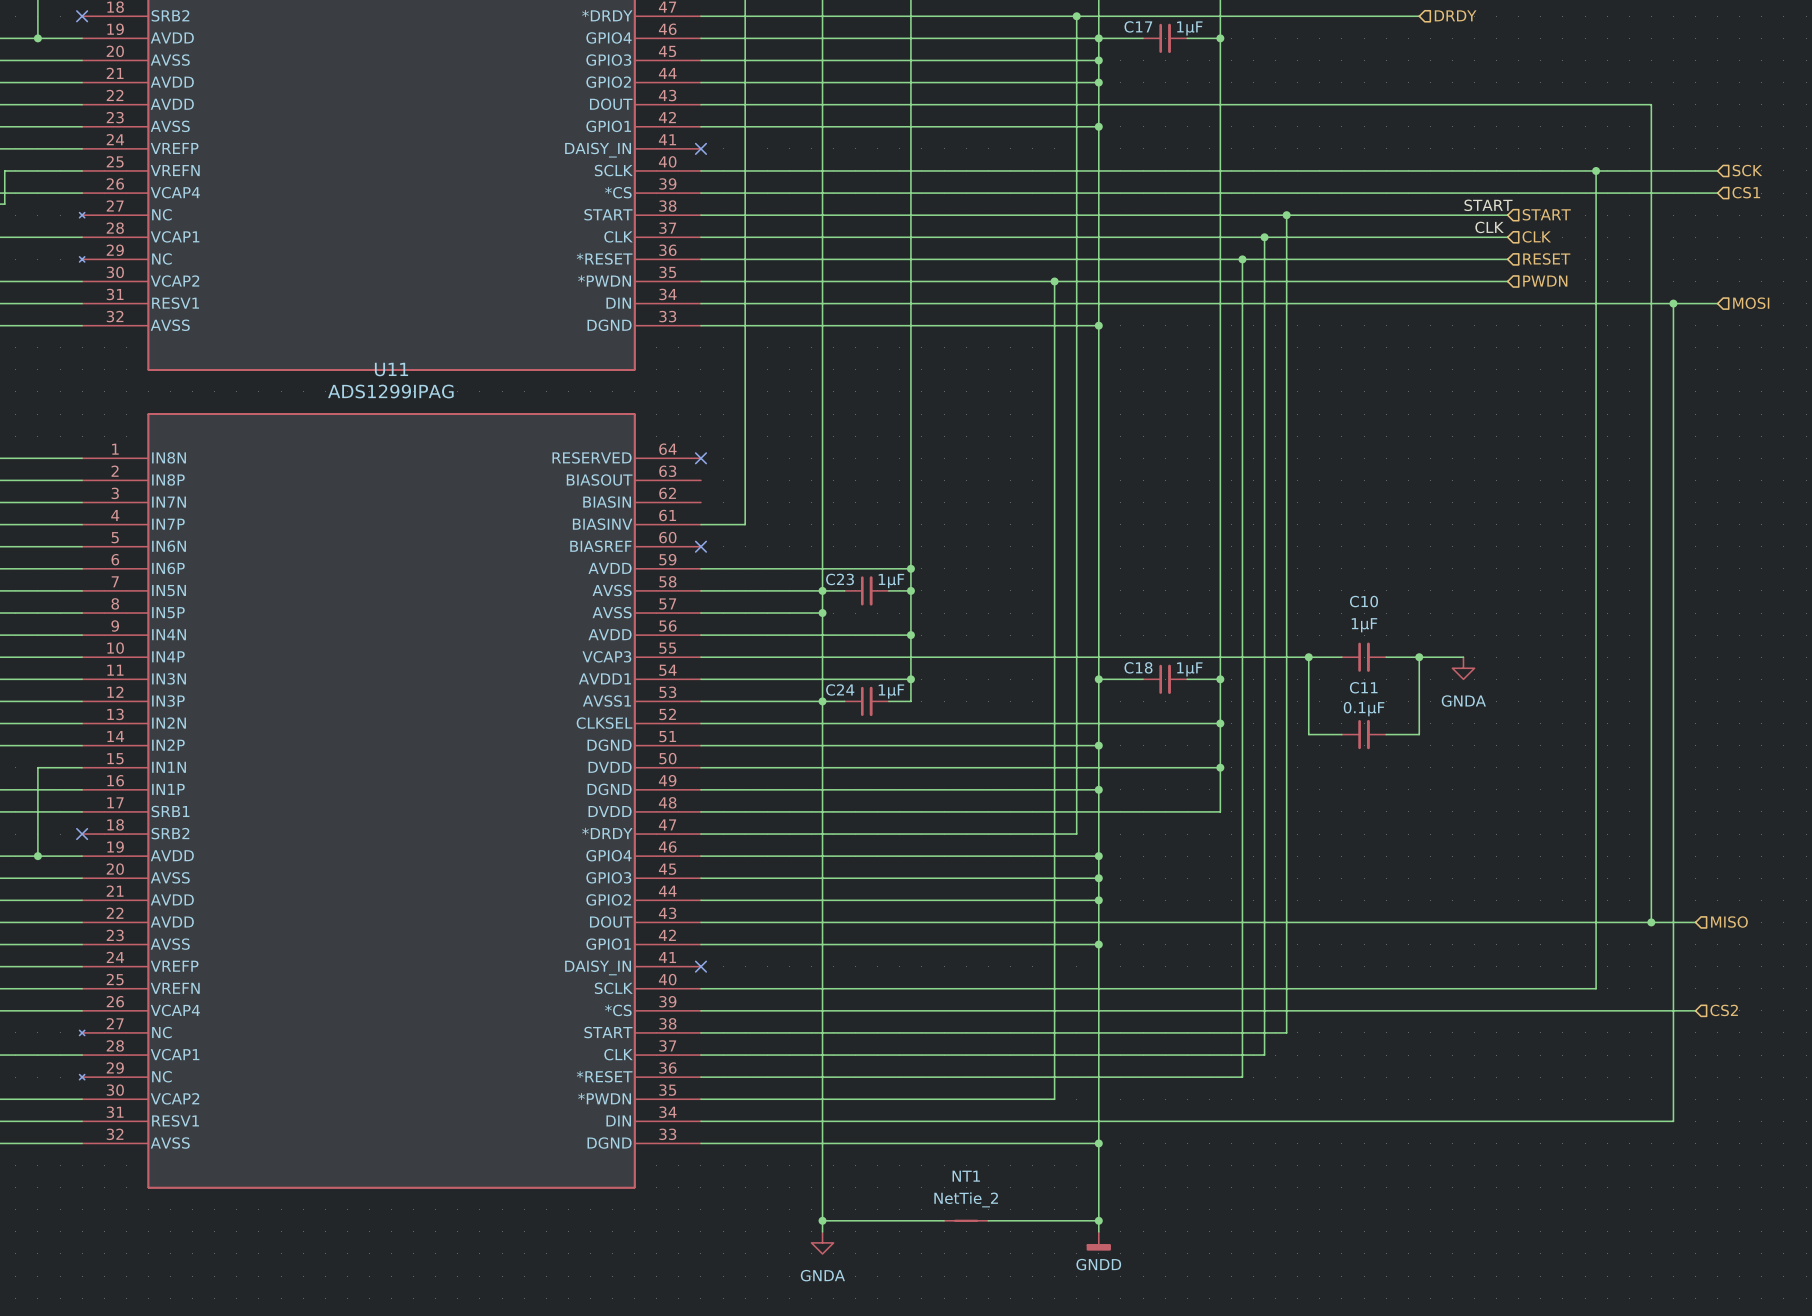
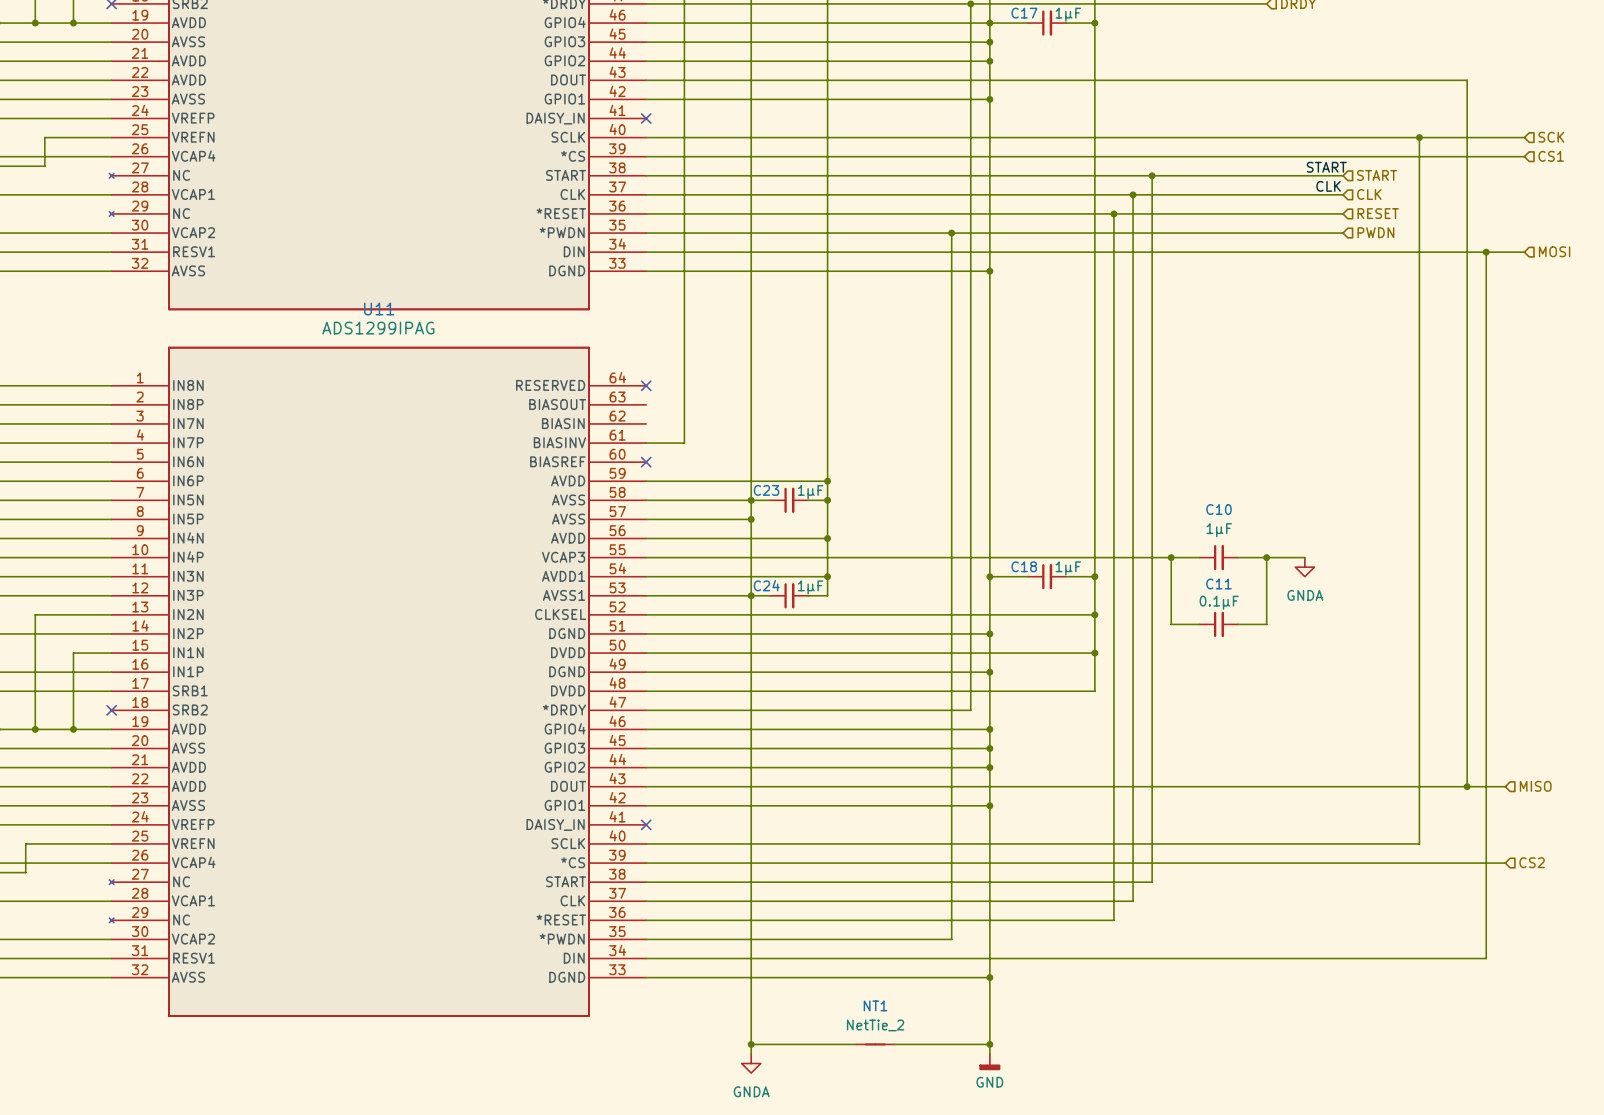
power symbol: GNDD (1098, 1241) -> GND (989, 1062)

